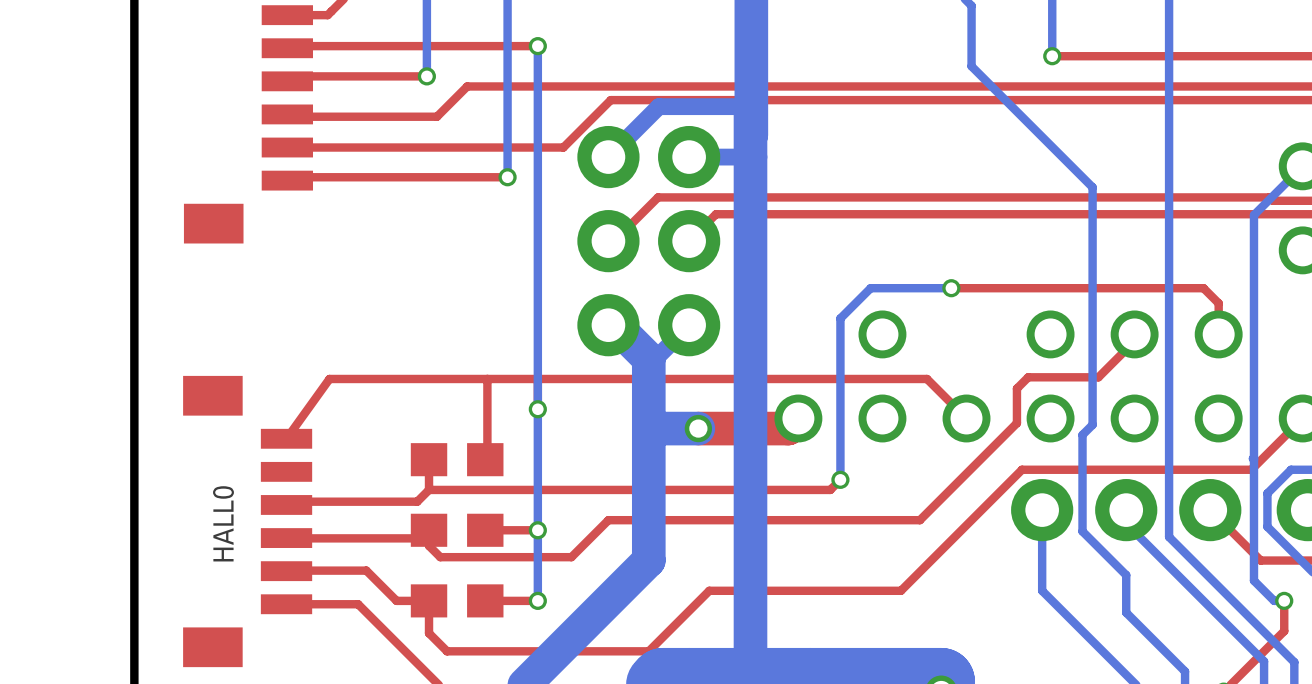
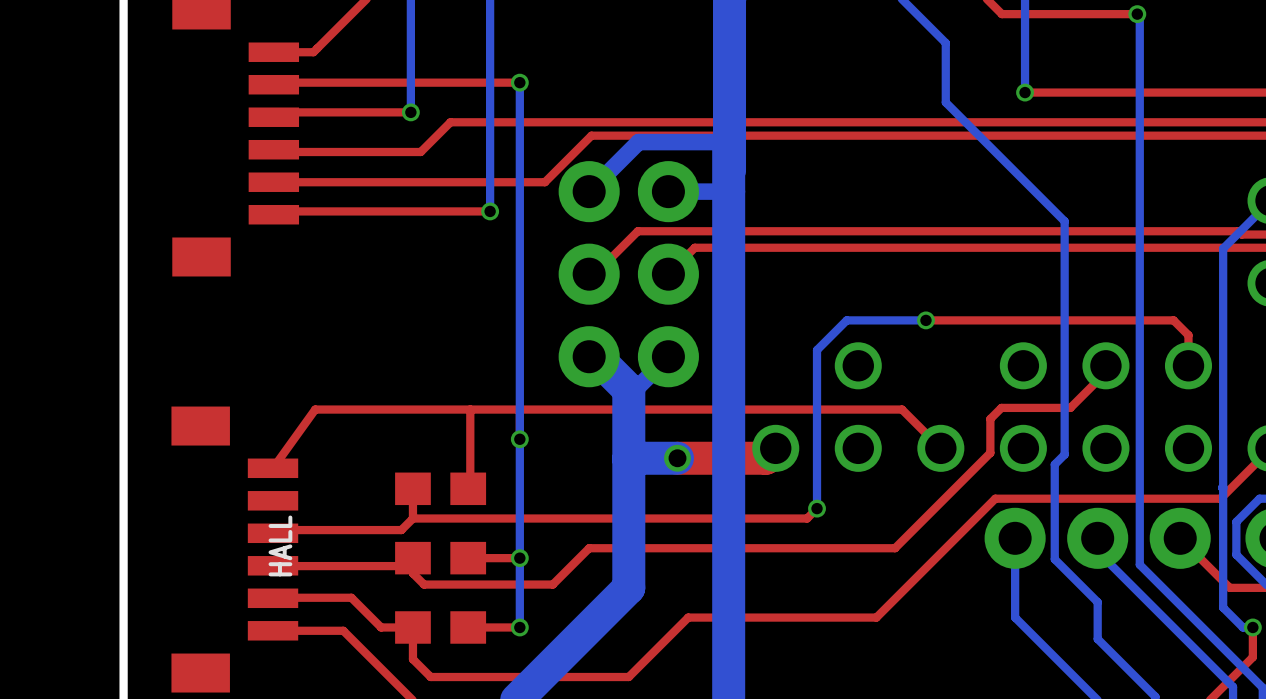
HALL0 name: HALL0 (223, 523) -> HALL (280, 545)

